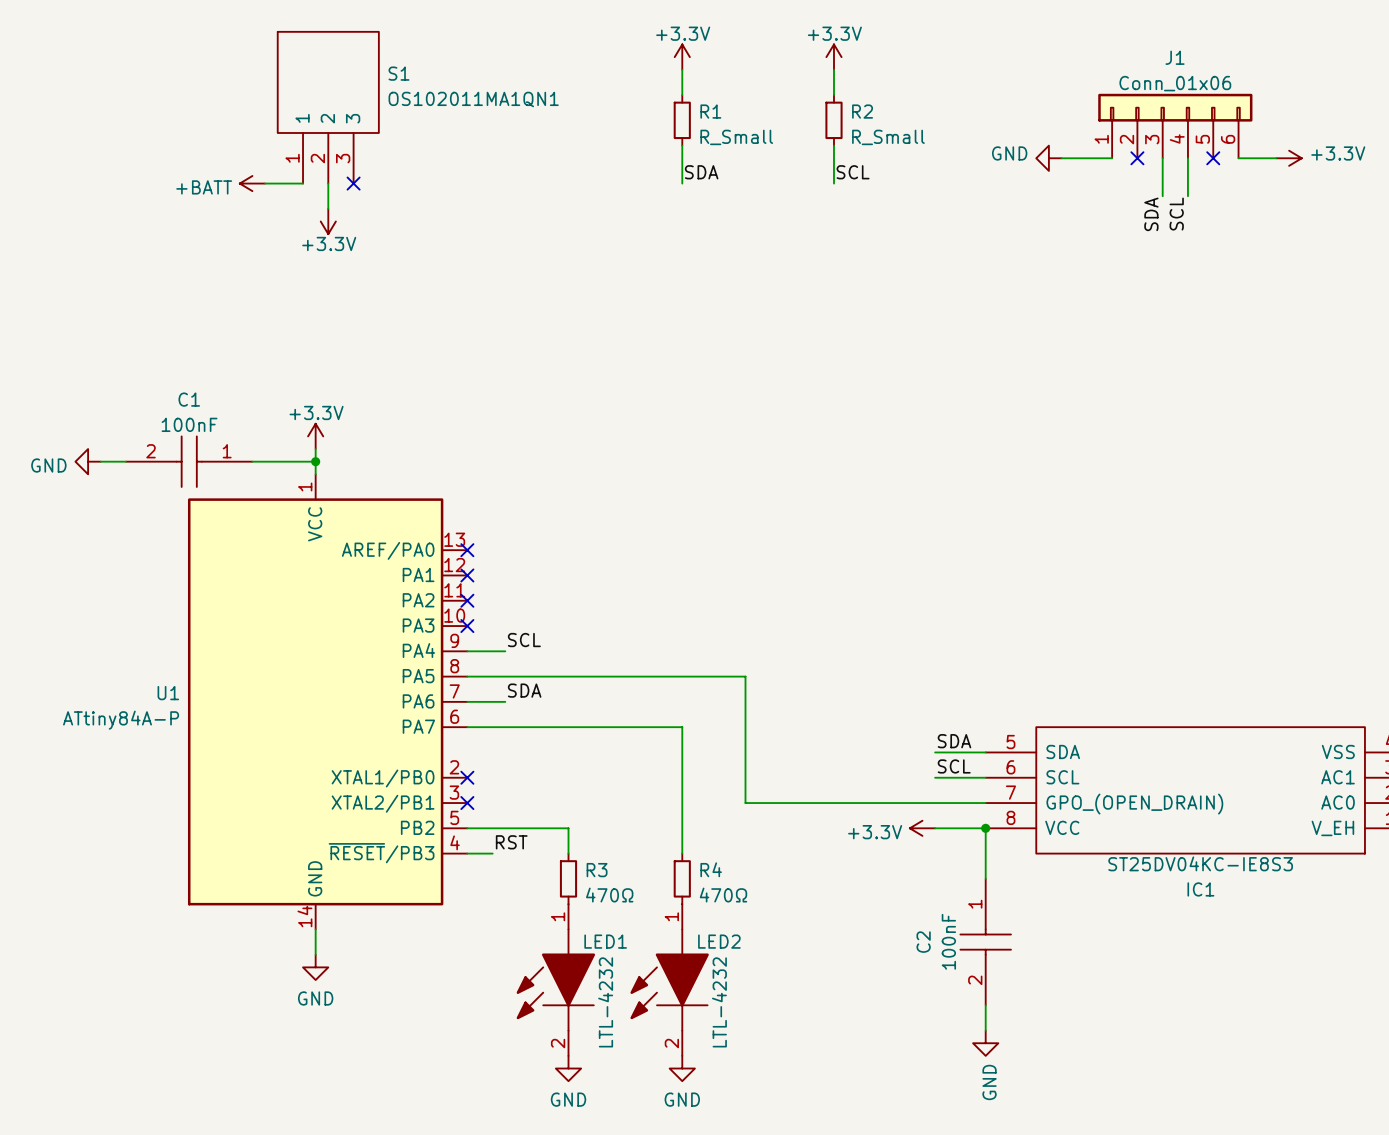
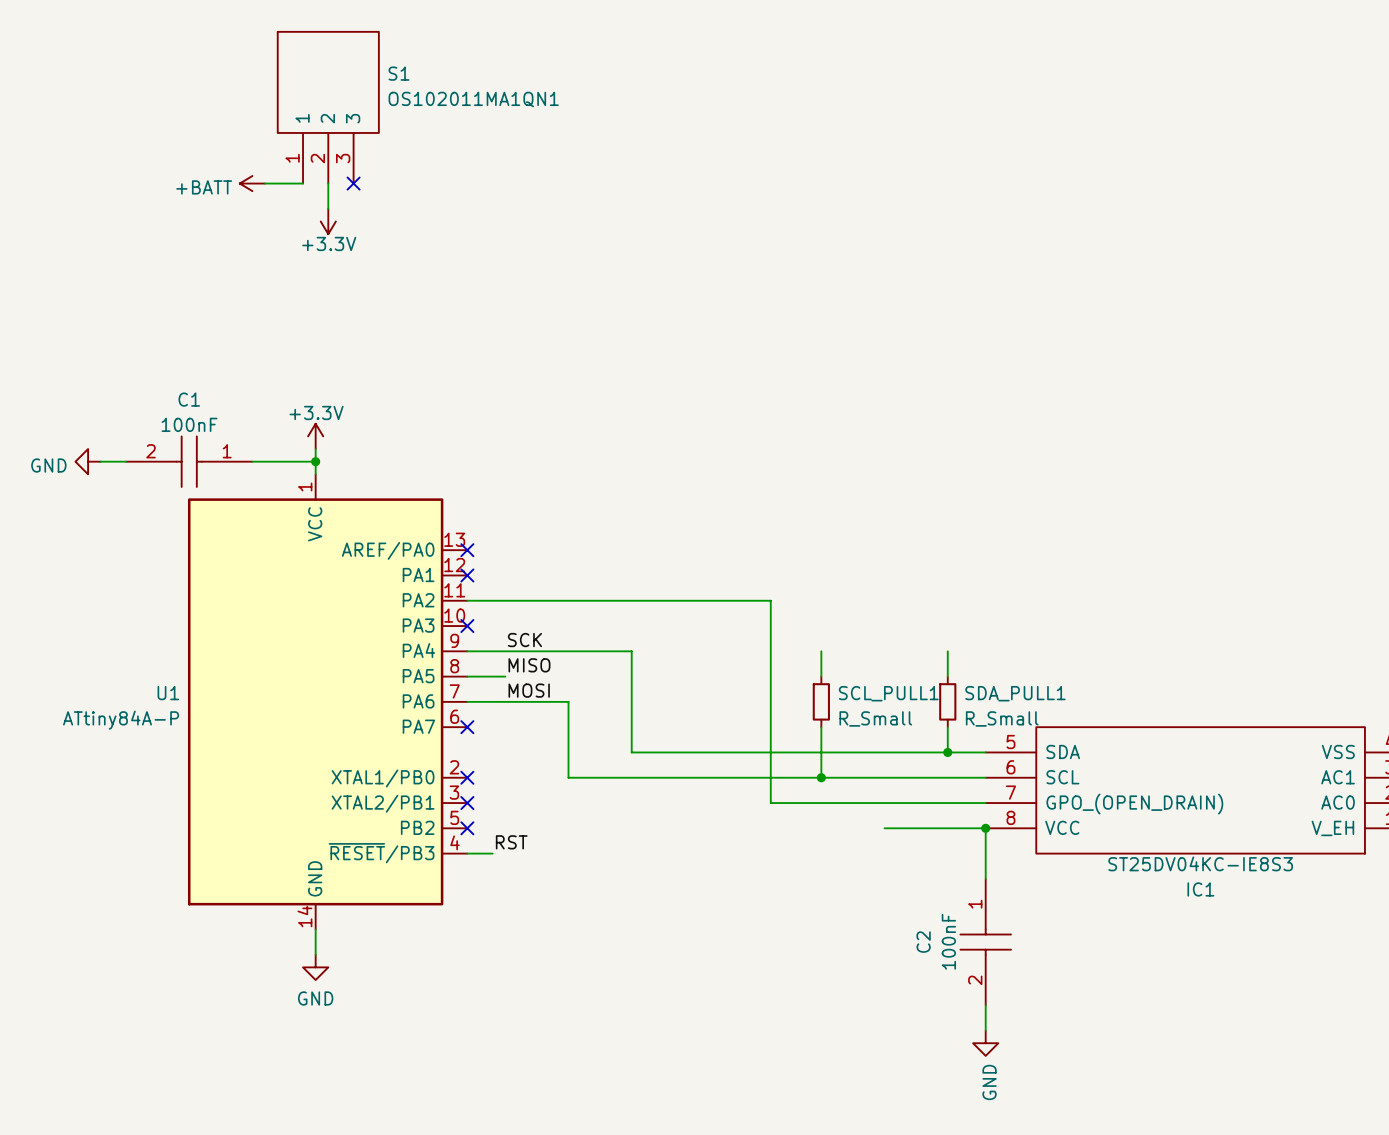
power symbol: +3.3V (682, 57) -> none
power symbol: +3.3V (833, 57) -> none
wire: (682, 69) (682, 95) -> none
wire: (833, 69) (833, 95) -> none
R1: R_Small (682, 120) -> none
R2: R_Small (833, 120) -> none
J1: Conn_01x06 (1175, 126) -> none
wire: (682, 145) (682, 183) -> none
wire: (833, 145) (833, 183) -> none
power symbol: GND (1048, 158) -> none
wire: (1061, 158) (1112, 158) -> none
no-connect mark: (1137, 158) -> none
wire: (1162, 158) (1162, 196) -> none
wire: (1187, 158) (1187, 196) -> none
no-connect mark: (1213, 158) -> none
wire: (1238, 158) (1276, 158) -> none
power symbol: +3.3V (1289, 158) -> none
label: SDA (701, 172) -> none
label: SCL (853, 172) -> none
label: SDA (1151, 214) -> none
label: SCL (1176, 214) -> none
no-connect mark: (467, 600) -> none
label: SCL (524, 640) -> SCK (524, 640)
wire: none -> (505, 651) (631, 651) (631, 752) (935, 752)
wire: none -> (821, 651) (821, 676)
wire: none -> (947, 651) (947, 676)
label: none -> MISO (529, 665)
wire: (505, 676) (745, 676) (745, 803) (770, 803) -> (467, 600) (770, 600) (770, 803)
label: SDA (524, 690) -> MOSI (529, 690)
wire: none -> (505, 701) (568, 701) (568, 777) (935, 777)
SCL_PULL1: none -> R_Small (821, 701)
SDA_PULL1: none -> R_Small (947, 701)
wire: (467, 727) (682, 727) (682, 853) -> none
no-connect mark: none -> (467, 727)
wire: none -> (821, 727) (821, 777)
wire: none -> (947, 727) (947, 752)
label: SDA (954, 741) -> none
junction: none -> (947, 752)
label: SCL (954, 766) -> none
junction: none -> (821, 777)
wire: (467, 828) (568, 828) (568, 853) -> none
no-connect mark: none -> (467, 828)
power symbol: +3.3V (922, 828) -> none
R3: 470Ω (568, 878) -> none
R4: 470Ω (682, 878) -> none
LED1: LTL-4232 (555, 980) -> none
LED2: LTL-4232 (669, 980) -> none
power symbol: GND (568, 1068) -> none
power symbol: GND (682, 1068) -> none

